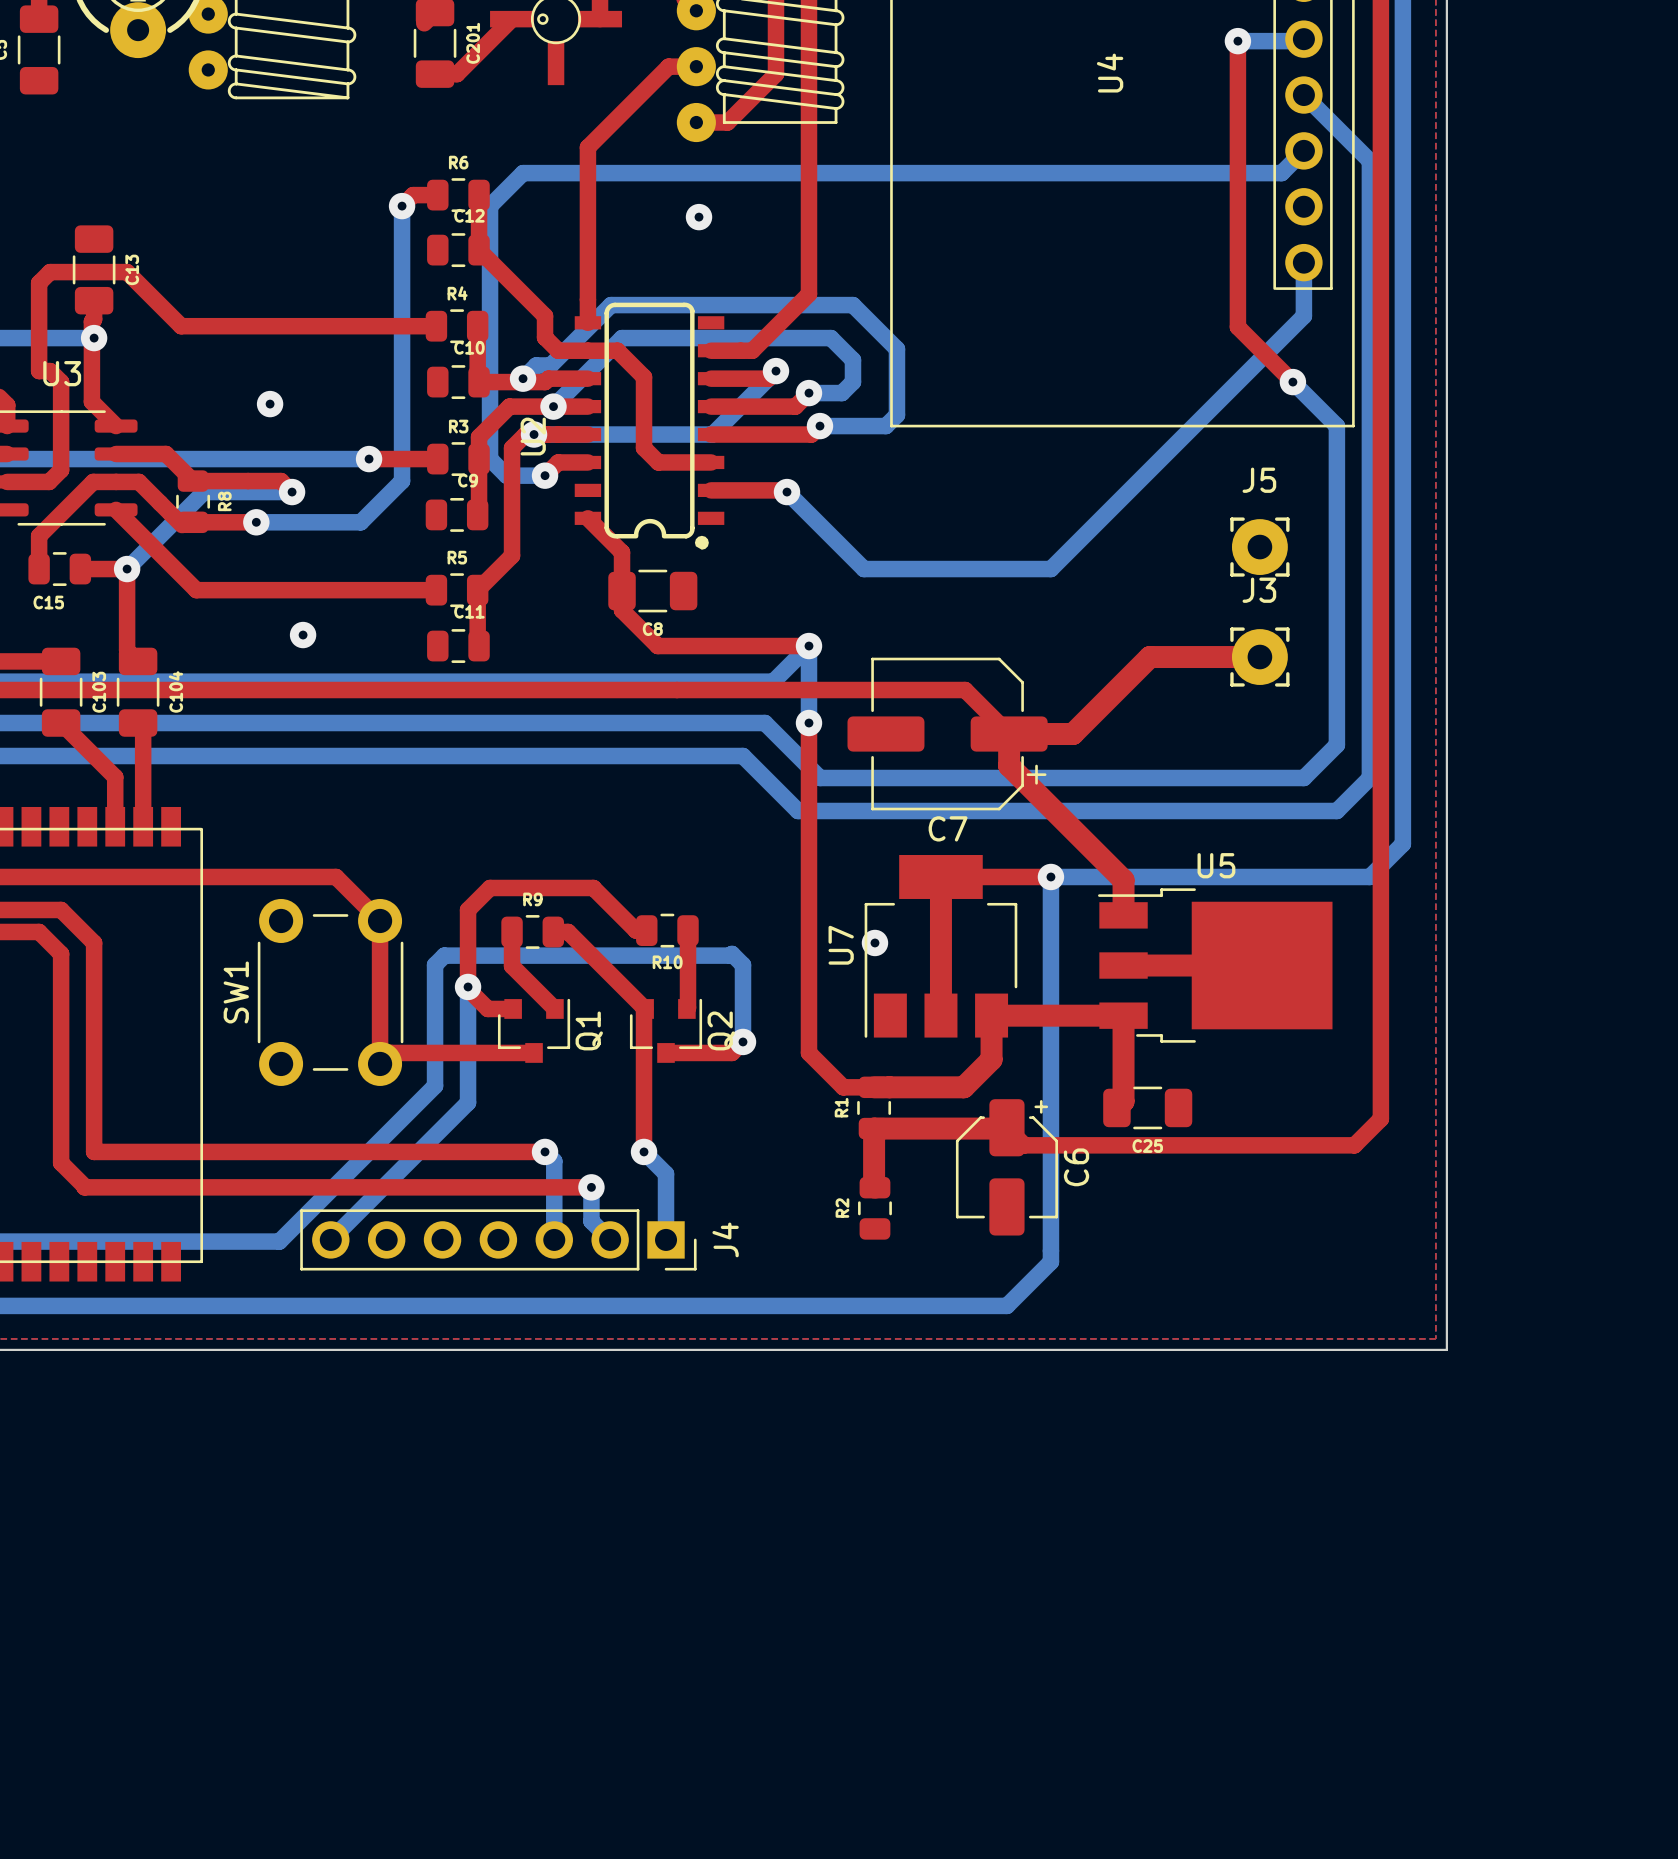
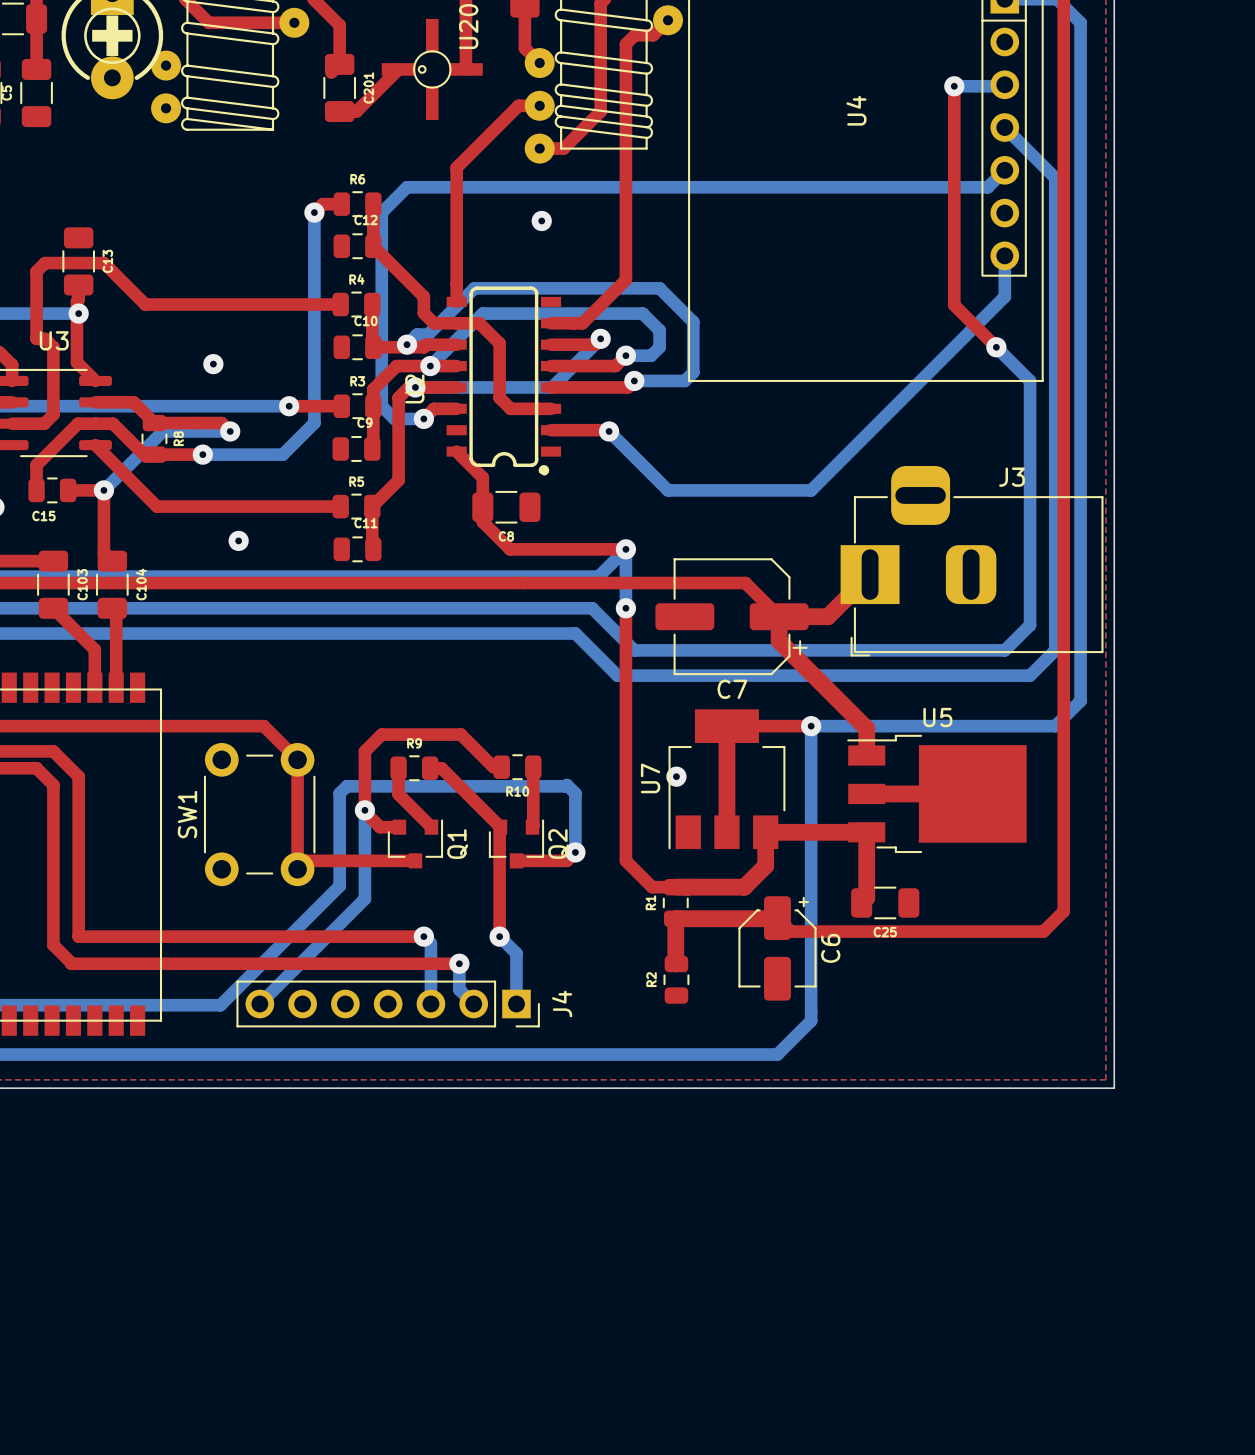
J5: (1259, 547) -> none
J3 name position: J3 (1259, 590) -> J3 (1011, 477)
J3 footprint: [1230, 627, 1290, 687] -> [840, 465, 1104, 657]
top track: (1259, 657) (1149, 657) (1127, 679) -> none

